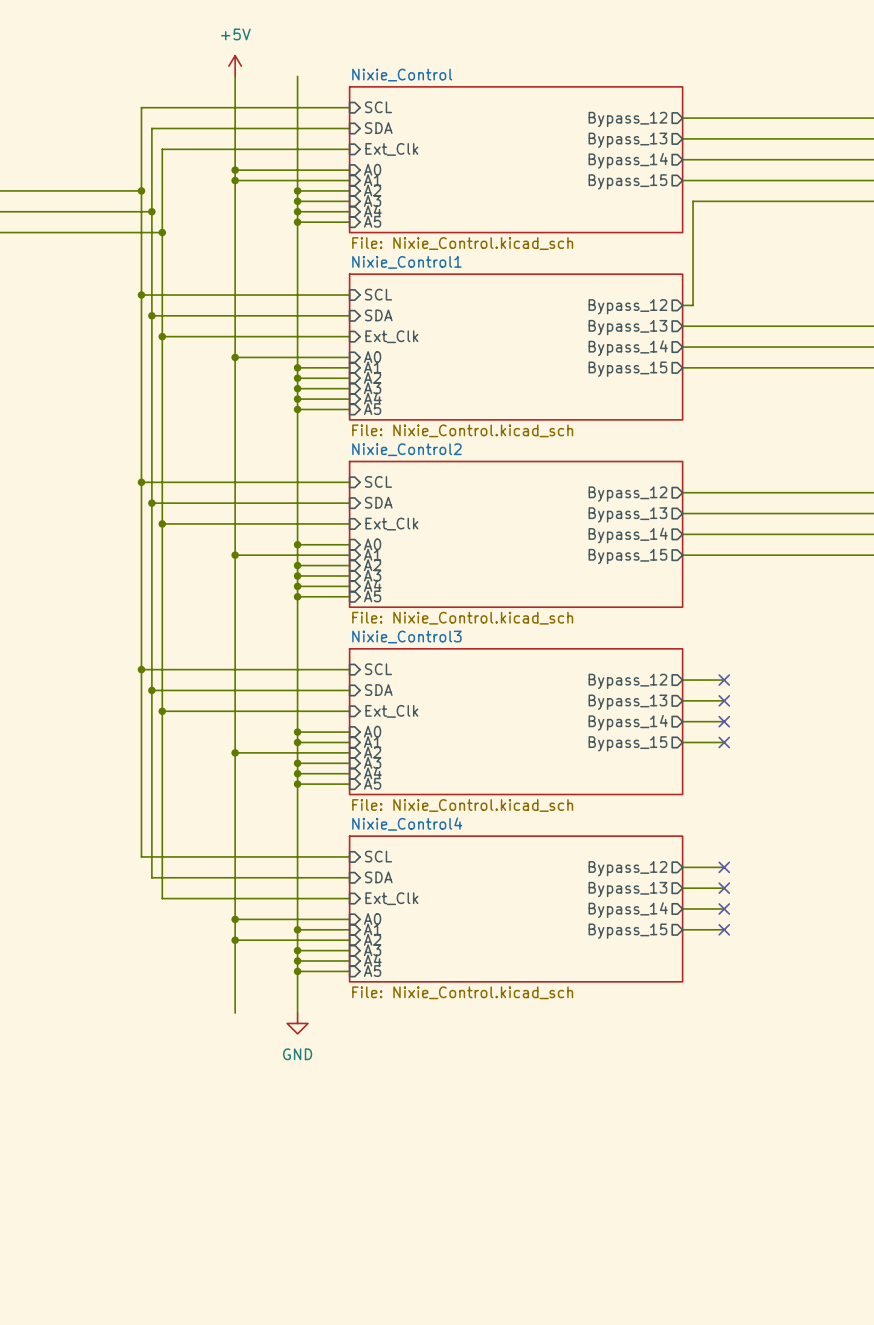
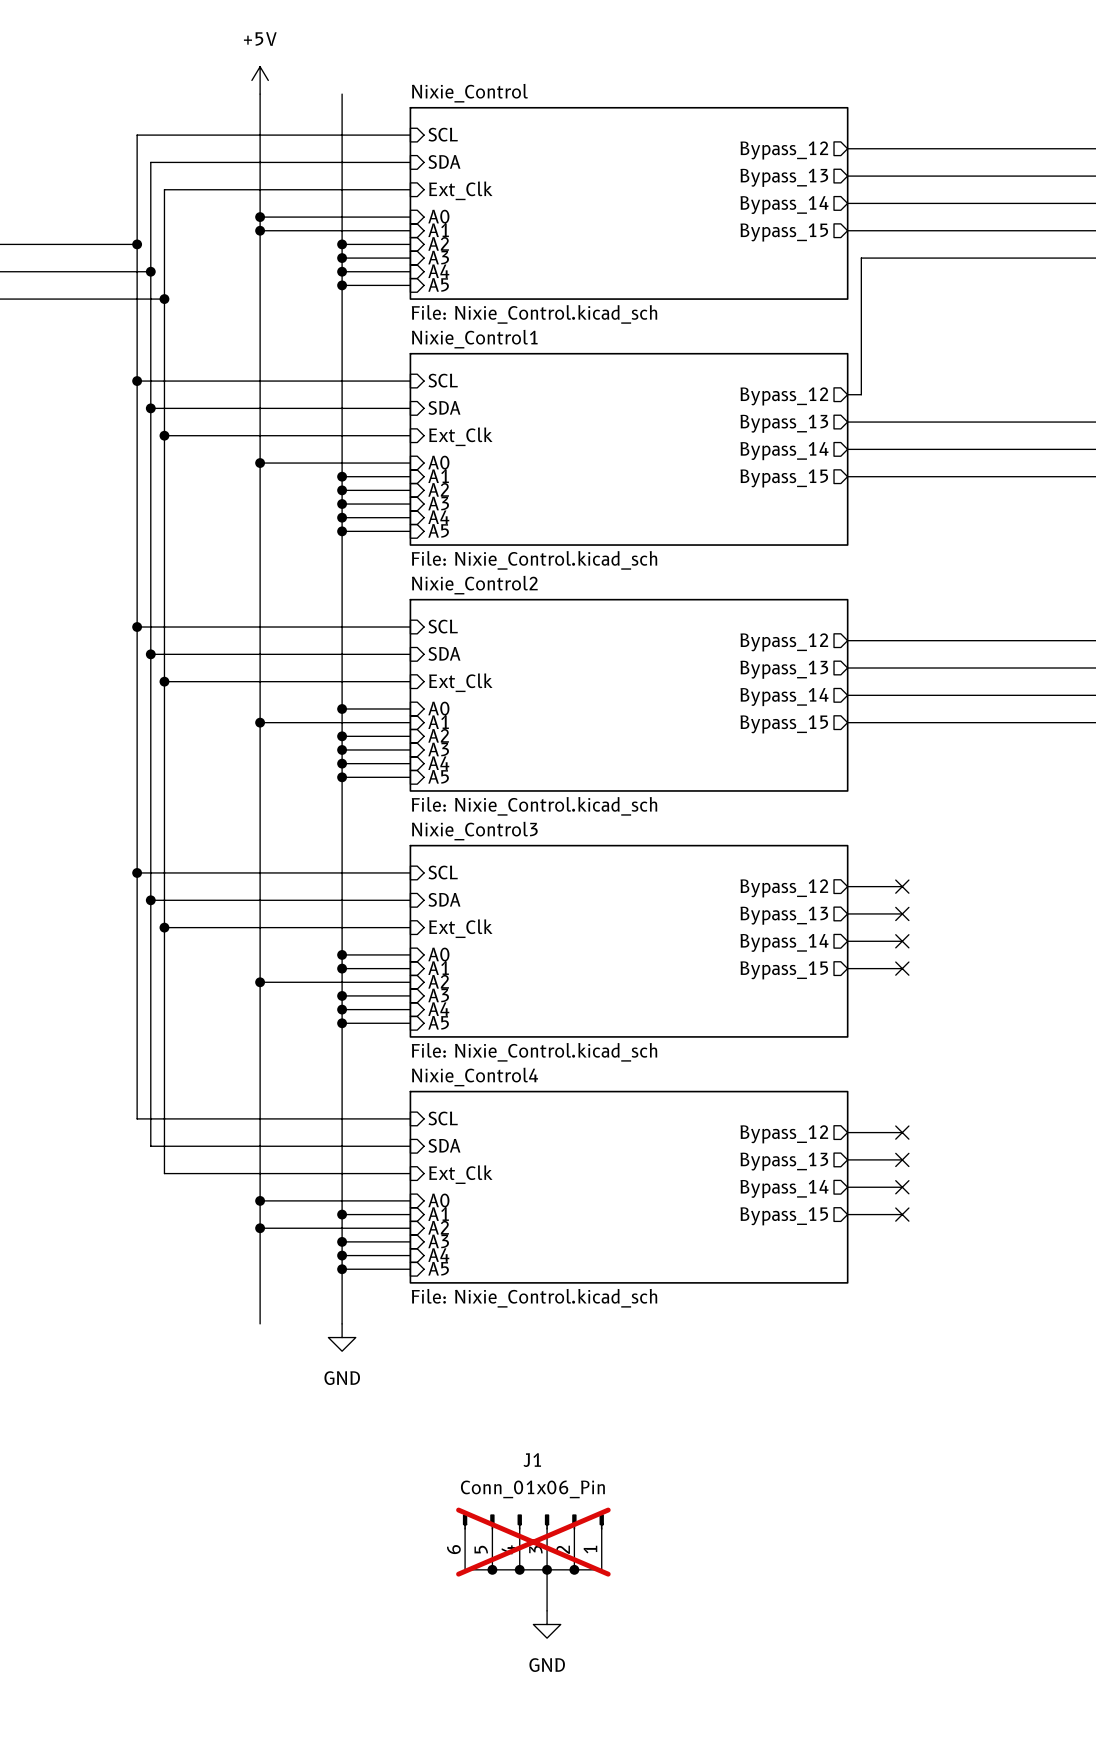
J1: none -> Conn_01x06_Pin (533, 1542)
wire: none -> (465, 1569) (601, 1569)
junction: none -> (492, 1569)
junction: none -> (519, 1569)
wire: none -> (547, 1569) (547, 1610)
junction: none -> (547, 1569)
junction: none -> (574, 1569)
power symbol: none -> GND (547, 1624)

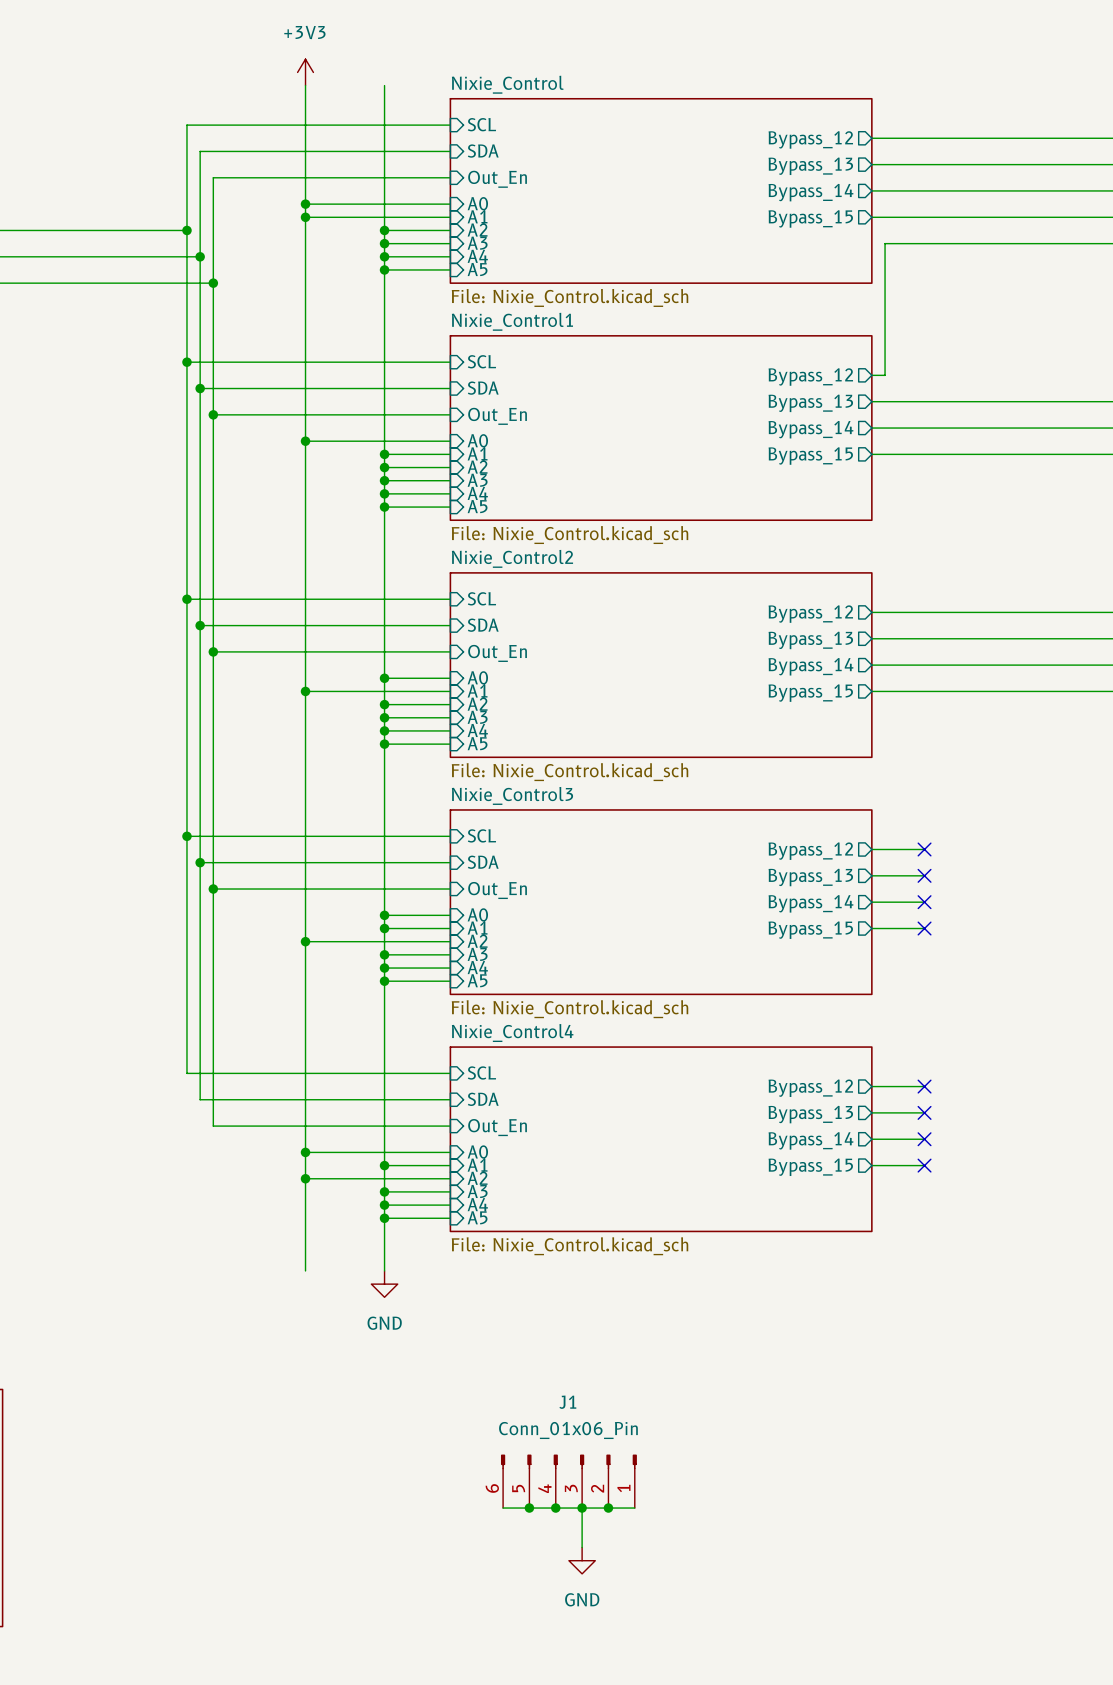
power symbol: +5V (260, 80) -> +3V3 (305, 72)
sheet pin: Ext_Clk (460, 190) -> Out_En (497, 179)
sheet pin: Ext_Clk (460, 436) -> Out_En (497, 416)
sheet pin: Ext_Clk (460, 682) -> Out_En (497, 653)
sheet pin: Ext_Clk (460, 928) -> Out_En (497, 890)
sheet pin: Ext_Clk (460, 1174) -> Out_En (497, 1127)
J1 do-not-place cross: (533, 1542) -> none

